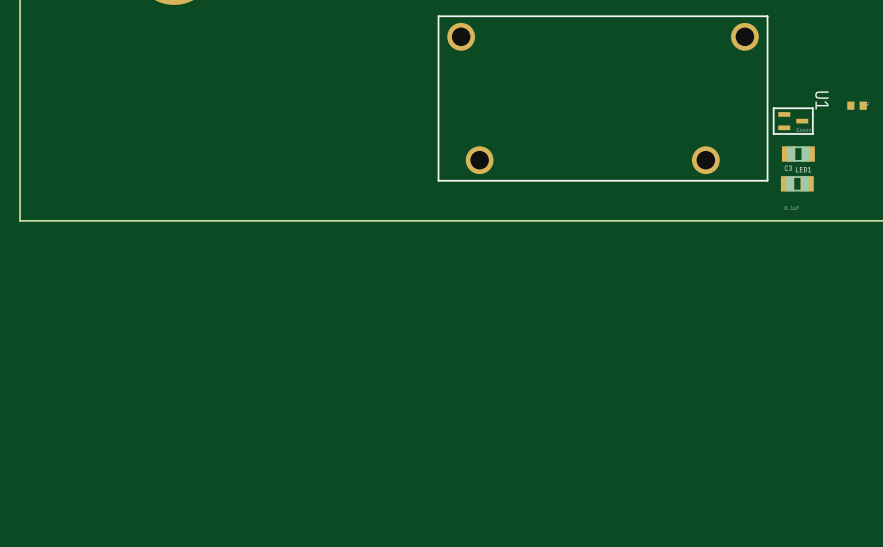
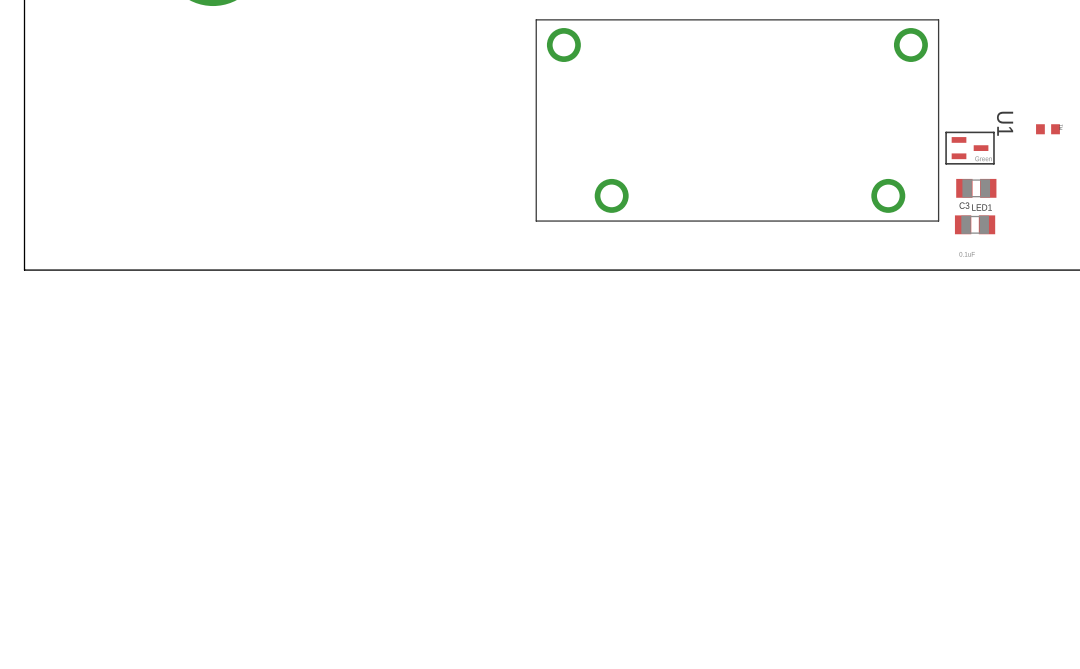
part footprint: [438, 15, 769, 182] -> [535, 19, 940, 222]

